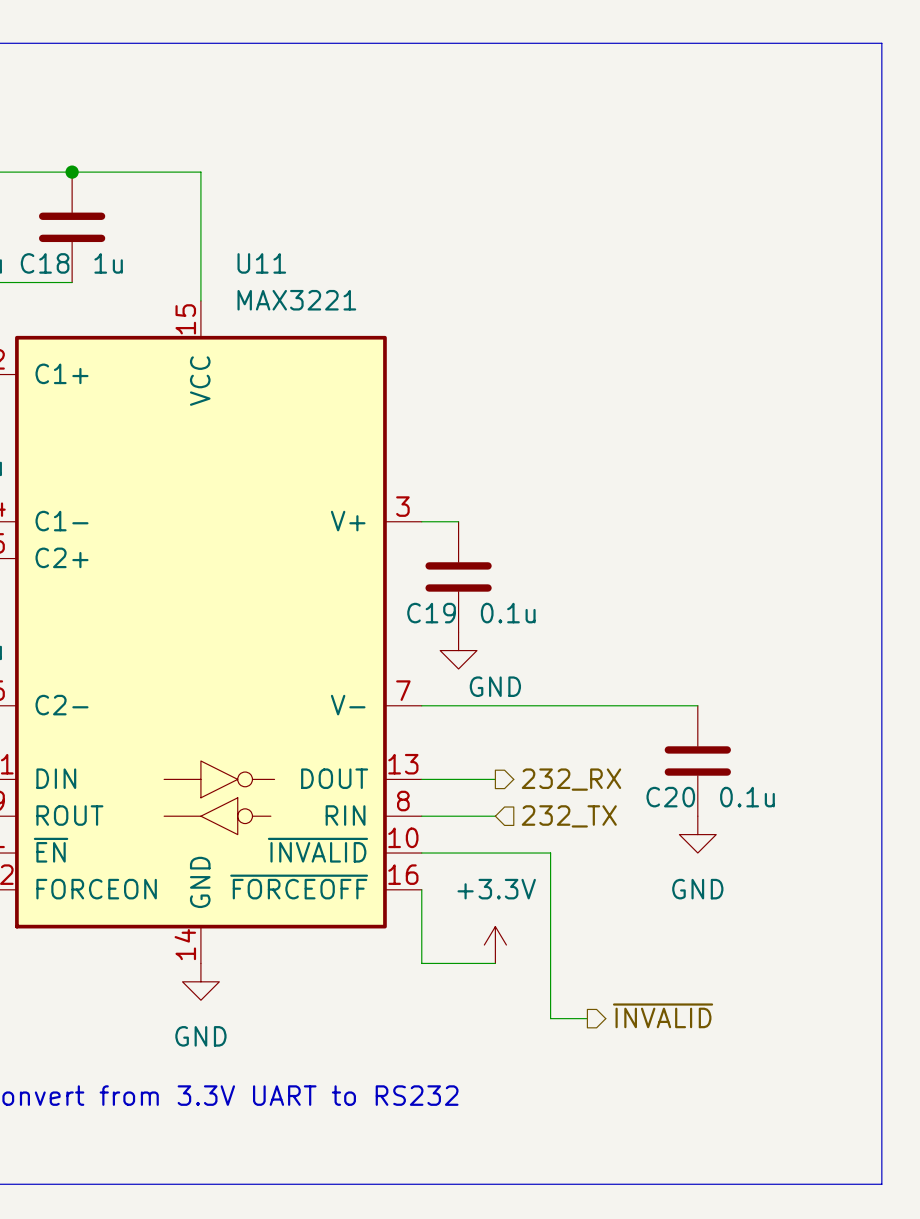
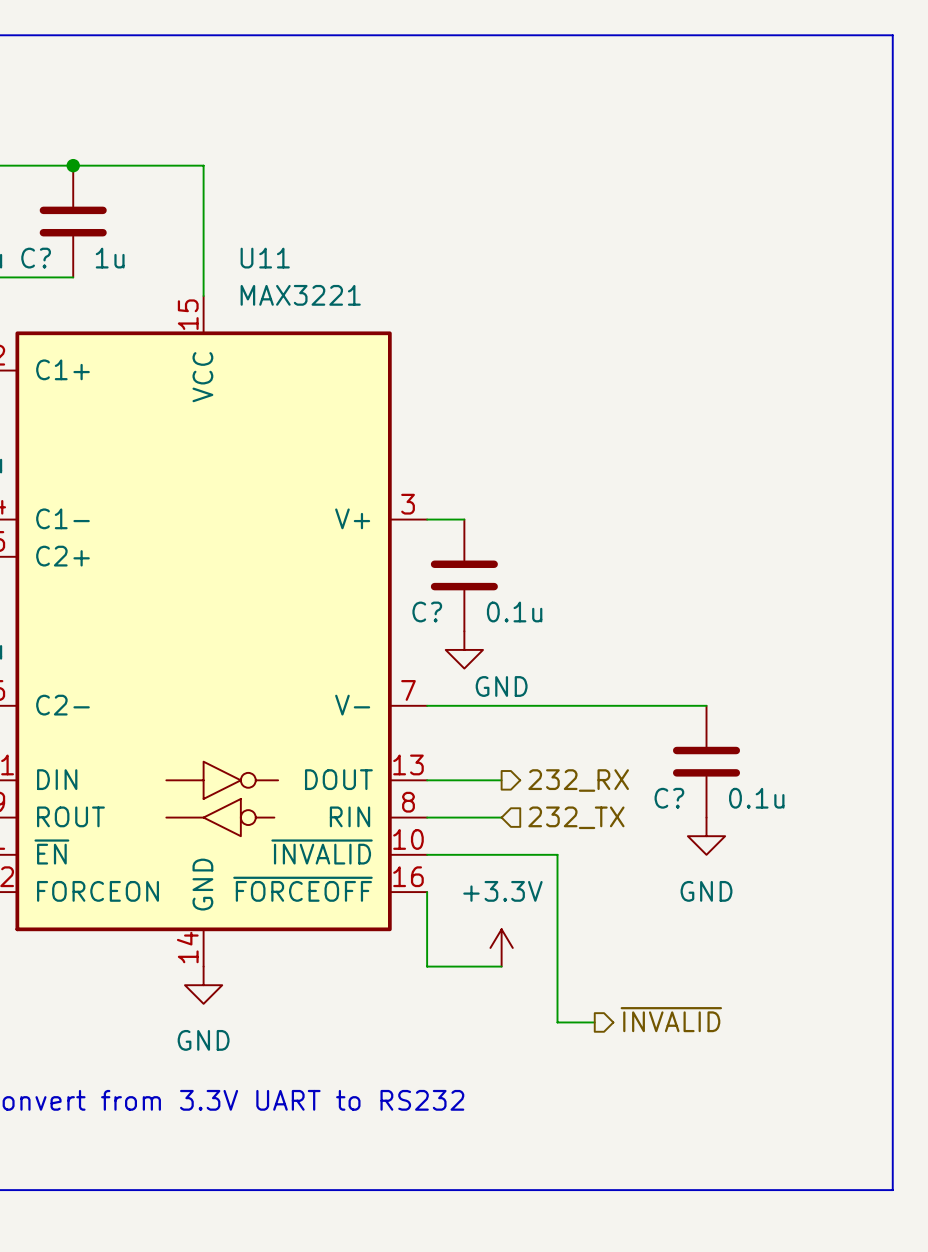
C18 name: C18 (45, 263) -> C? (36, 258)
C19 name: C19 (431, 613) -> C? (427, 611)
C20 name: C20 (670, 797) -> C? (669, 798)

